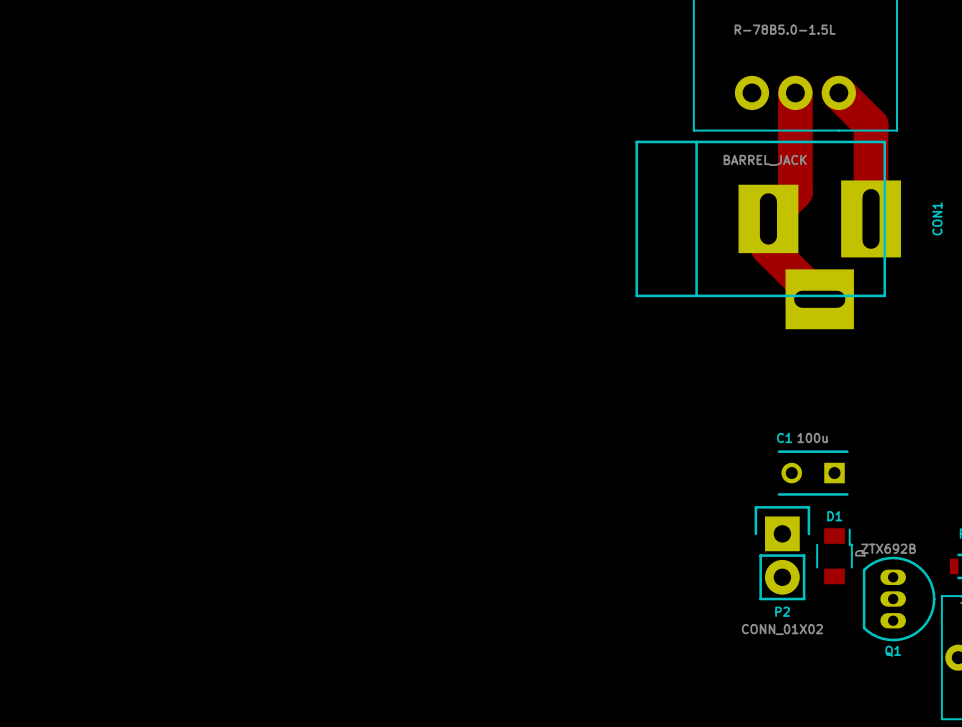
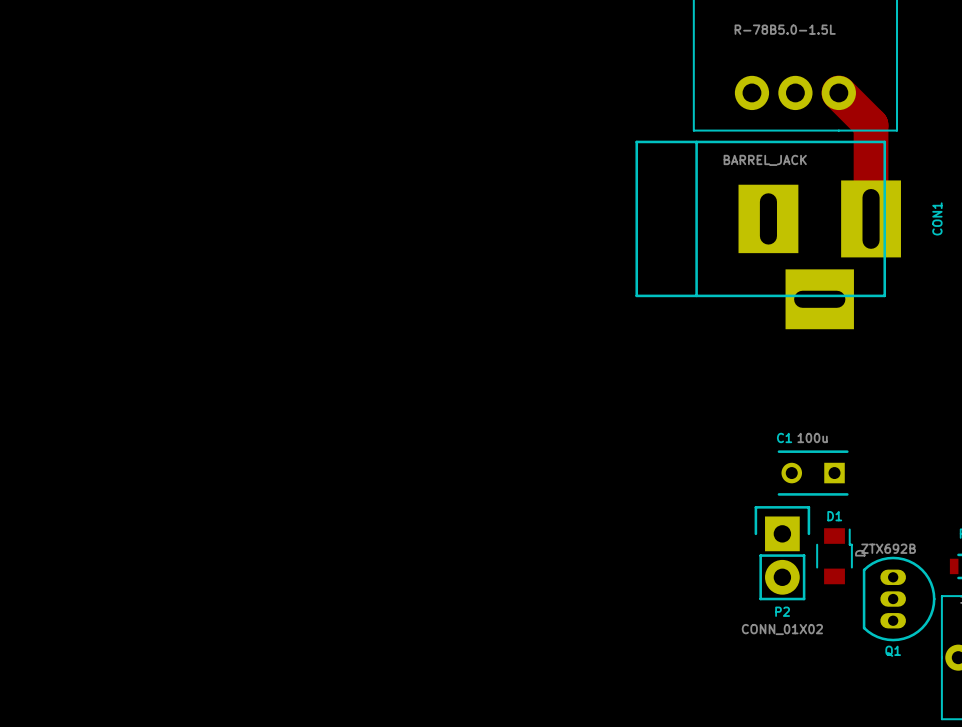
track: (795, 92) (795, 191) (768, 218) (768, 247) (819, 299) -> none

